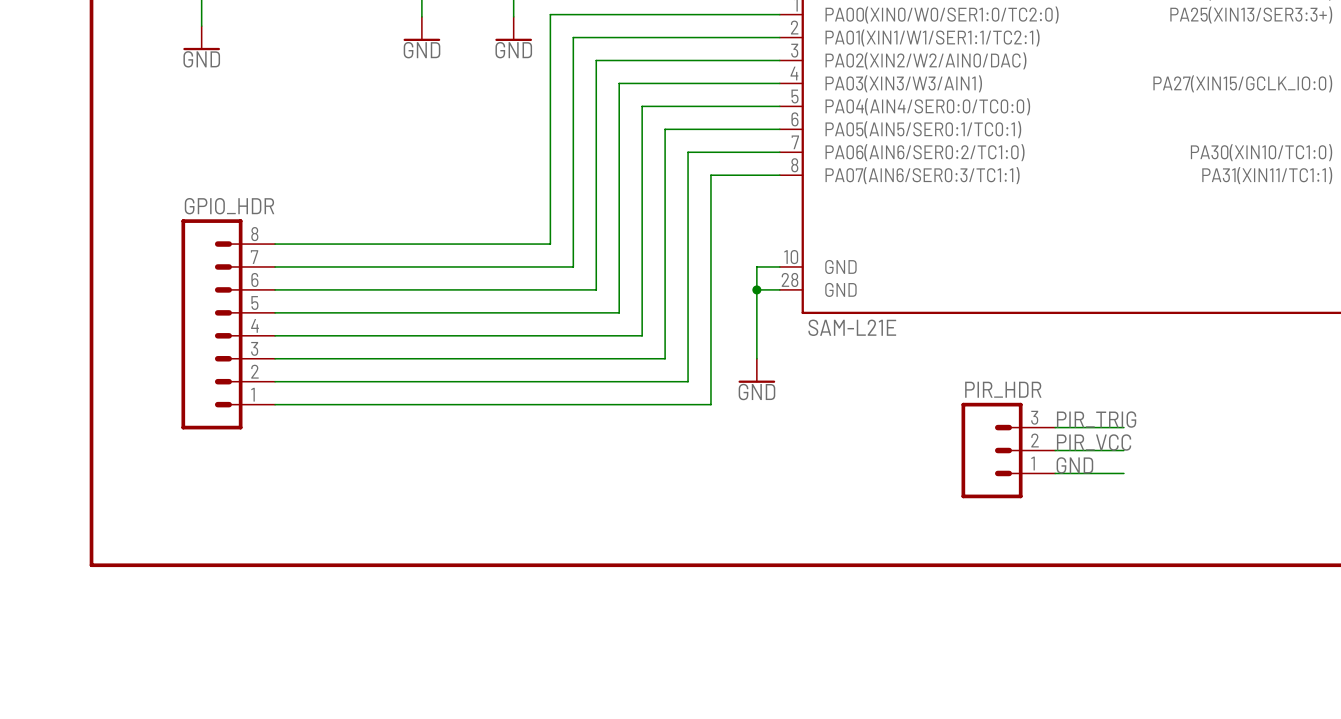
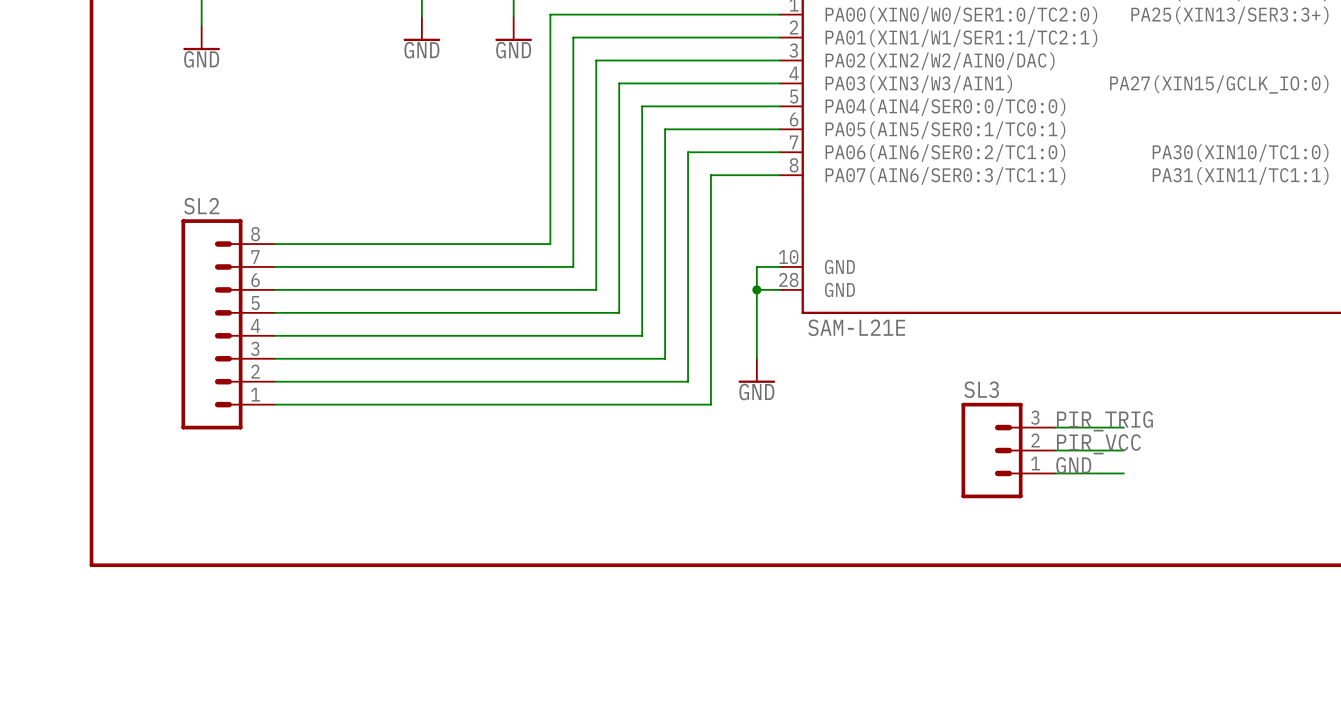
GPIO_HDR name: GPIO_HDR (229, 206) -> SL2 (201, 206)
PIR_HDR name: PIR_HDR (1003, 389) -> SL3 (981, 389)

